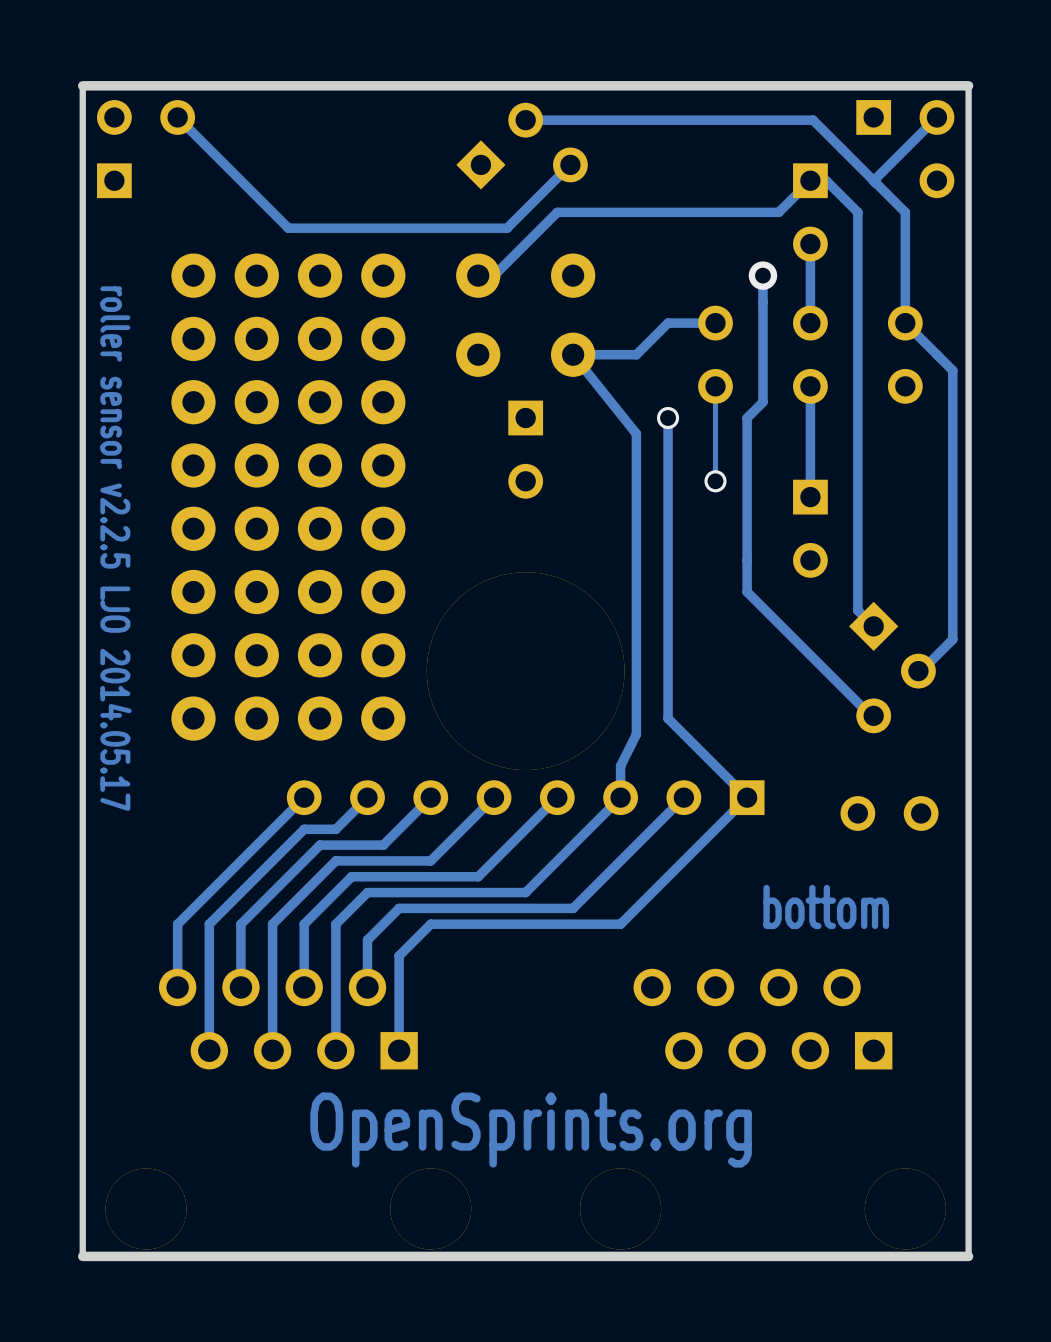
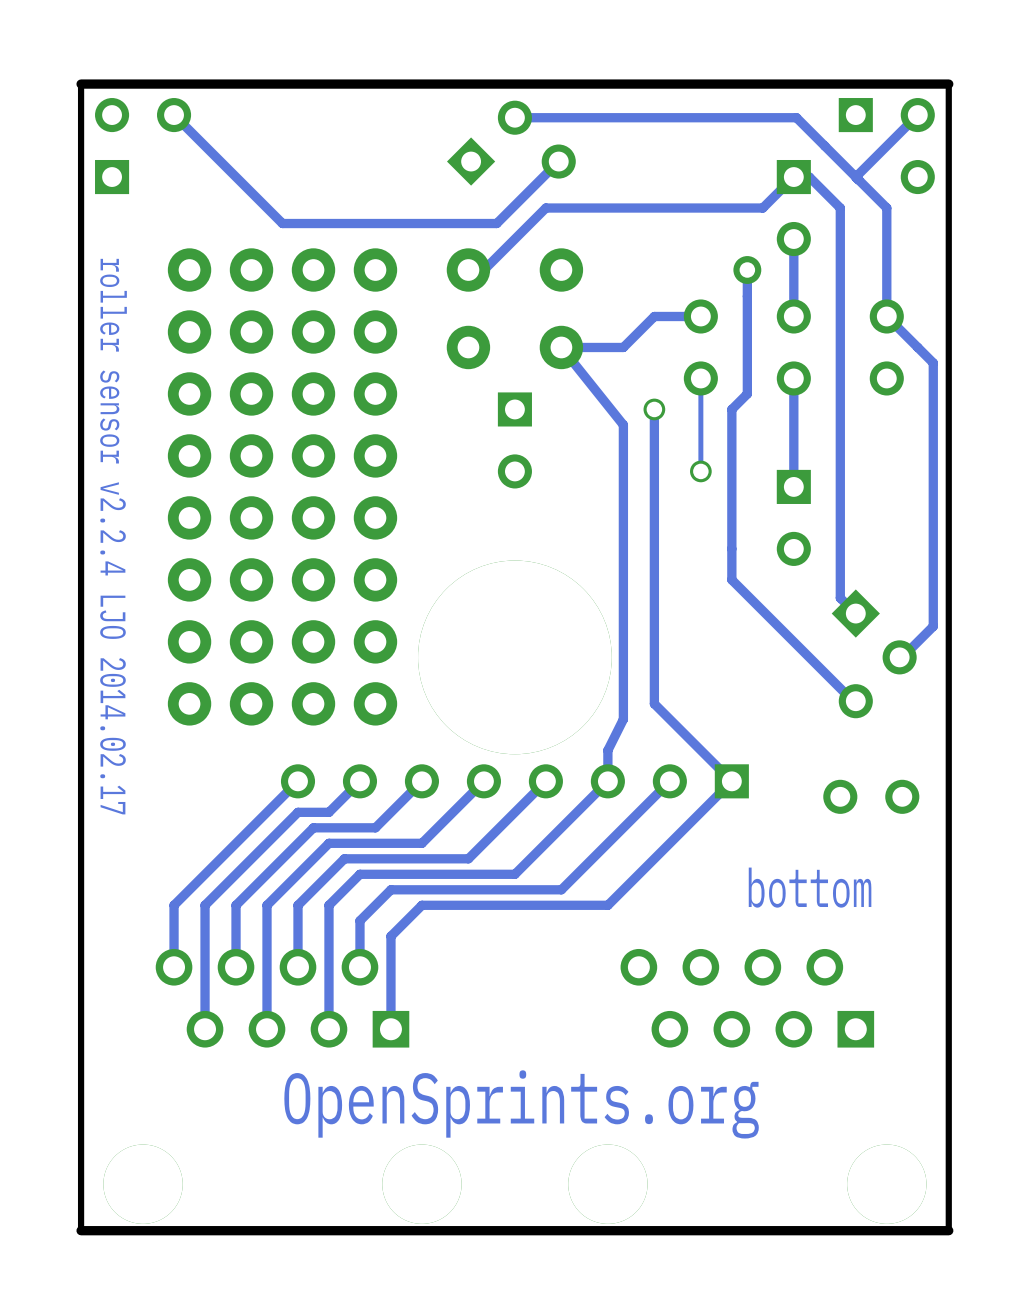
text: roller sensor v2.2.5 LJO 2014.05.17 (115, 548) -> roller sensor v2.2.4 LJO 2014.02.17 (113, 536)

